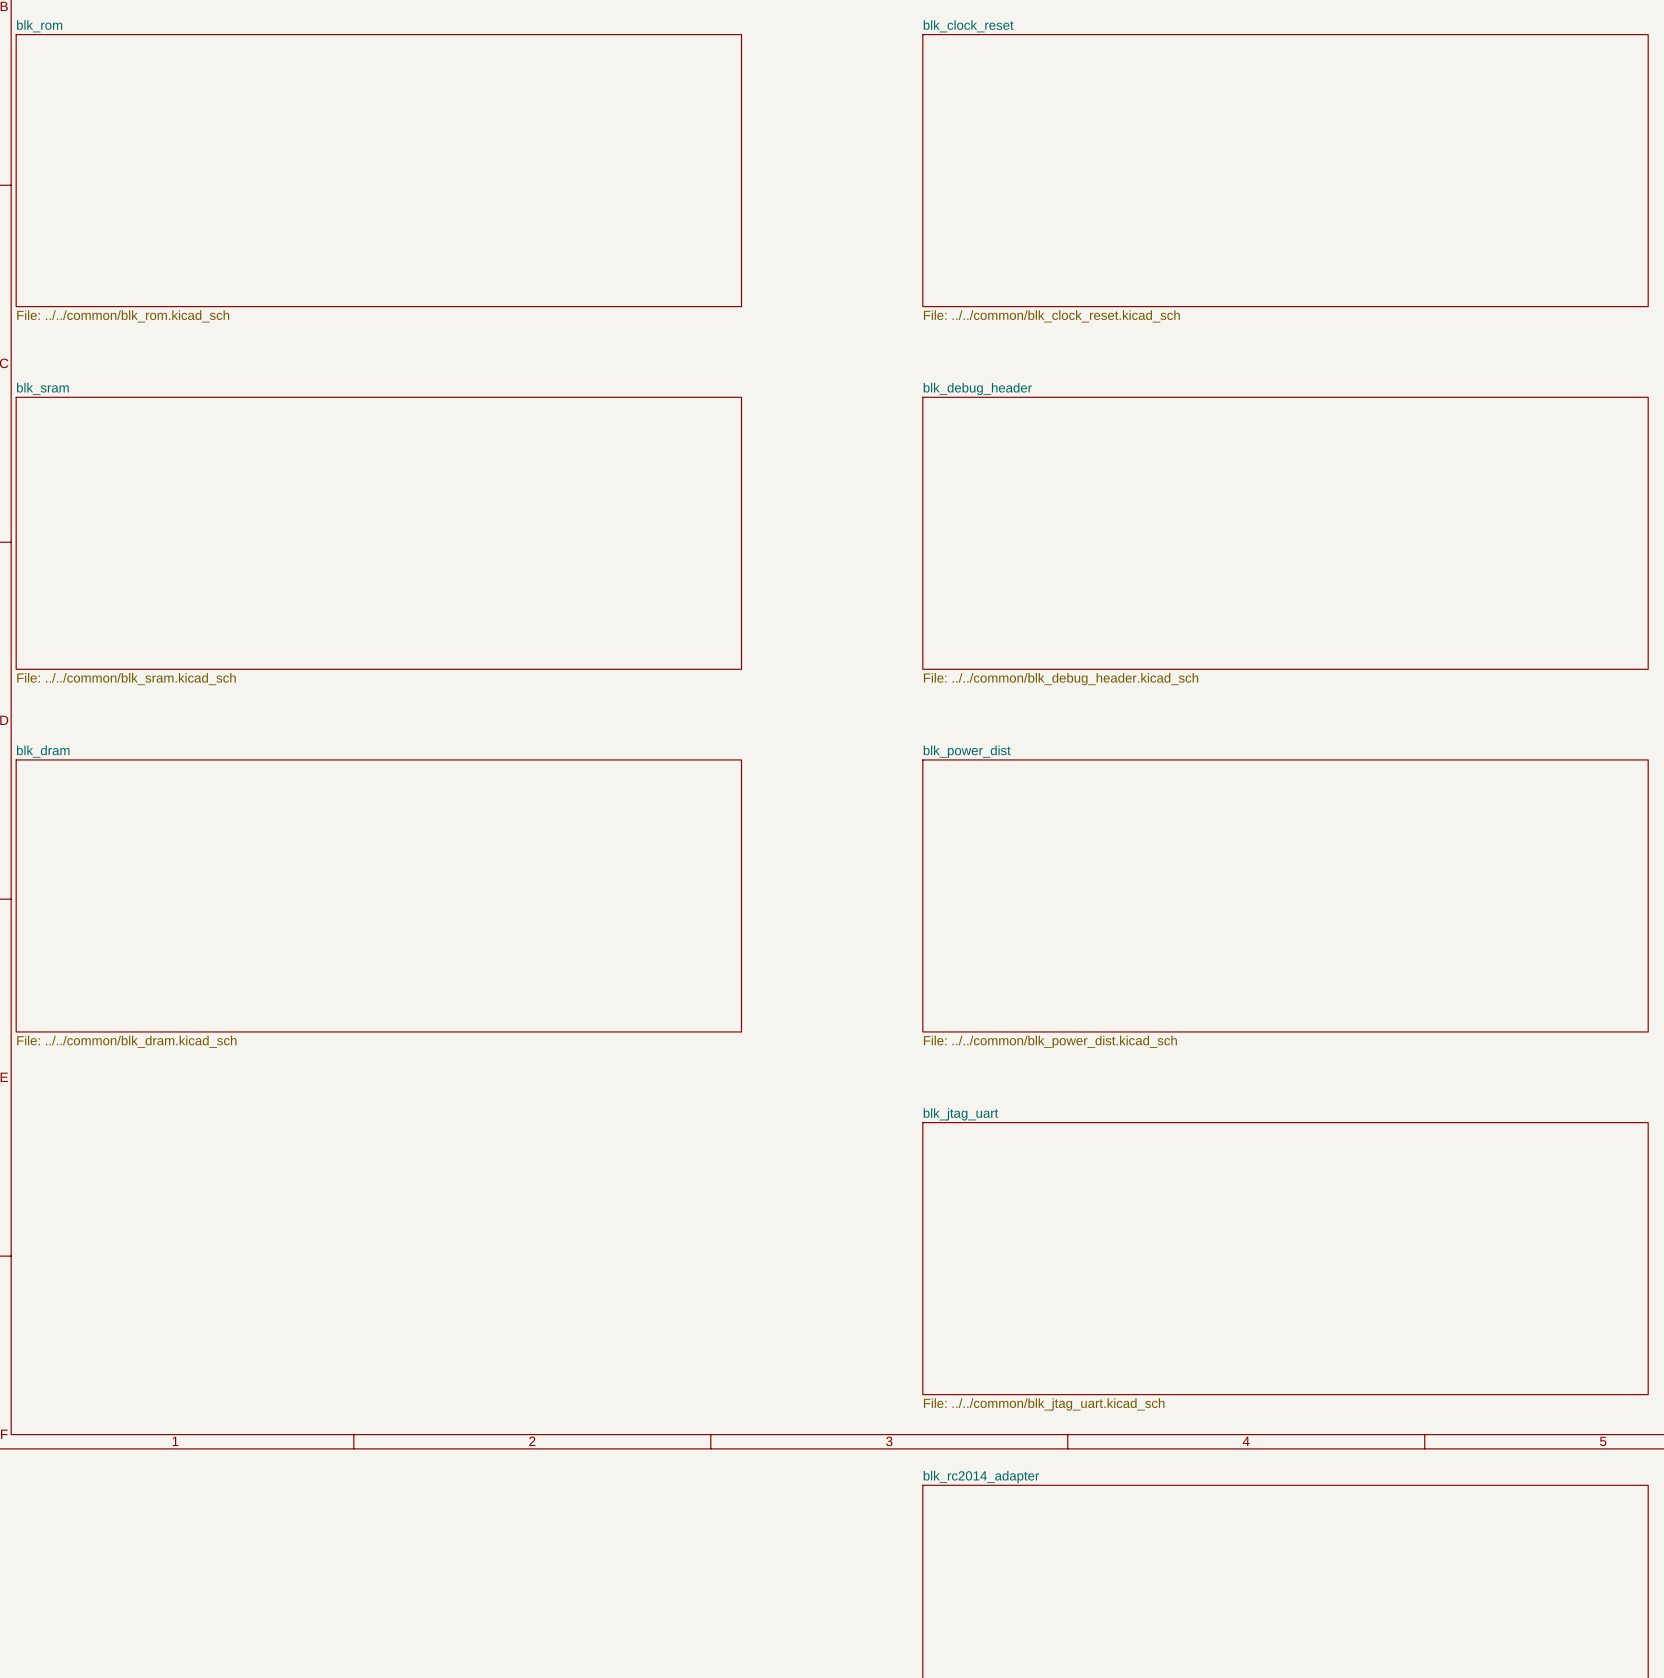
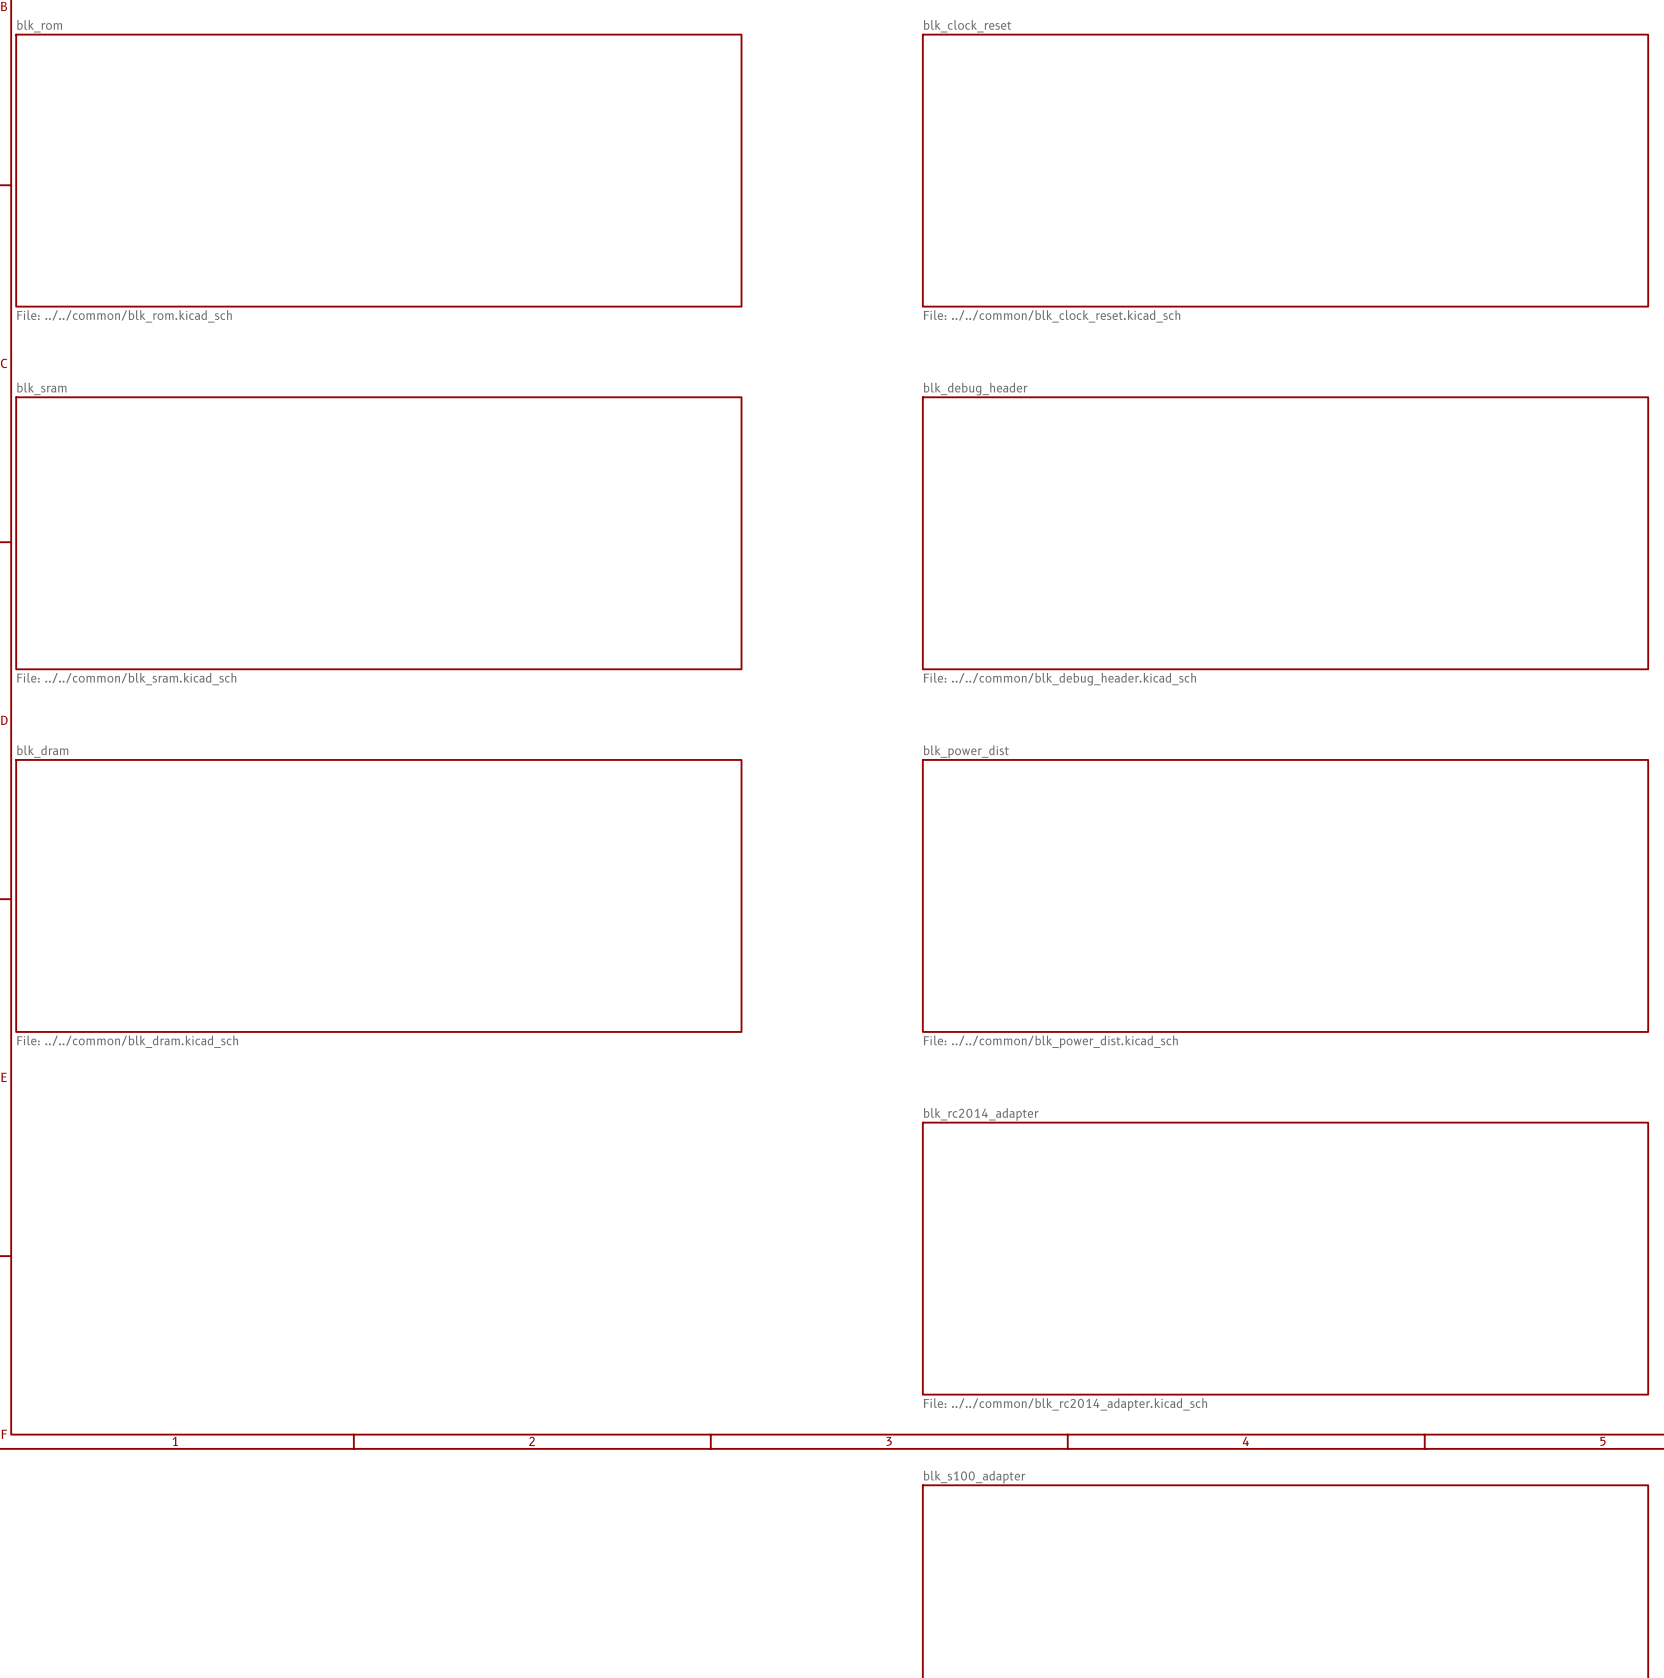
sheet blk_jtag_uart name: blk_jtag_uart (960, 1114) -> blk_rc2014_adapter (981, 1114)
sheet blk_jtag_uart value: File: ../../common/blk_jtag_uart.kicad_sch (1044, 1404) -> File: ../../common/blk_rc2014_adapter.kicad_sch (1065, 1404)
sheet blk_rc2014_adapter name: blk_rc2014_adapter (981, 1477) -> blk_s100_adapter (974, 1477)

